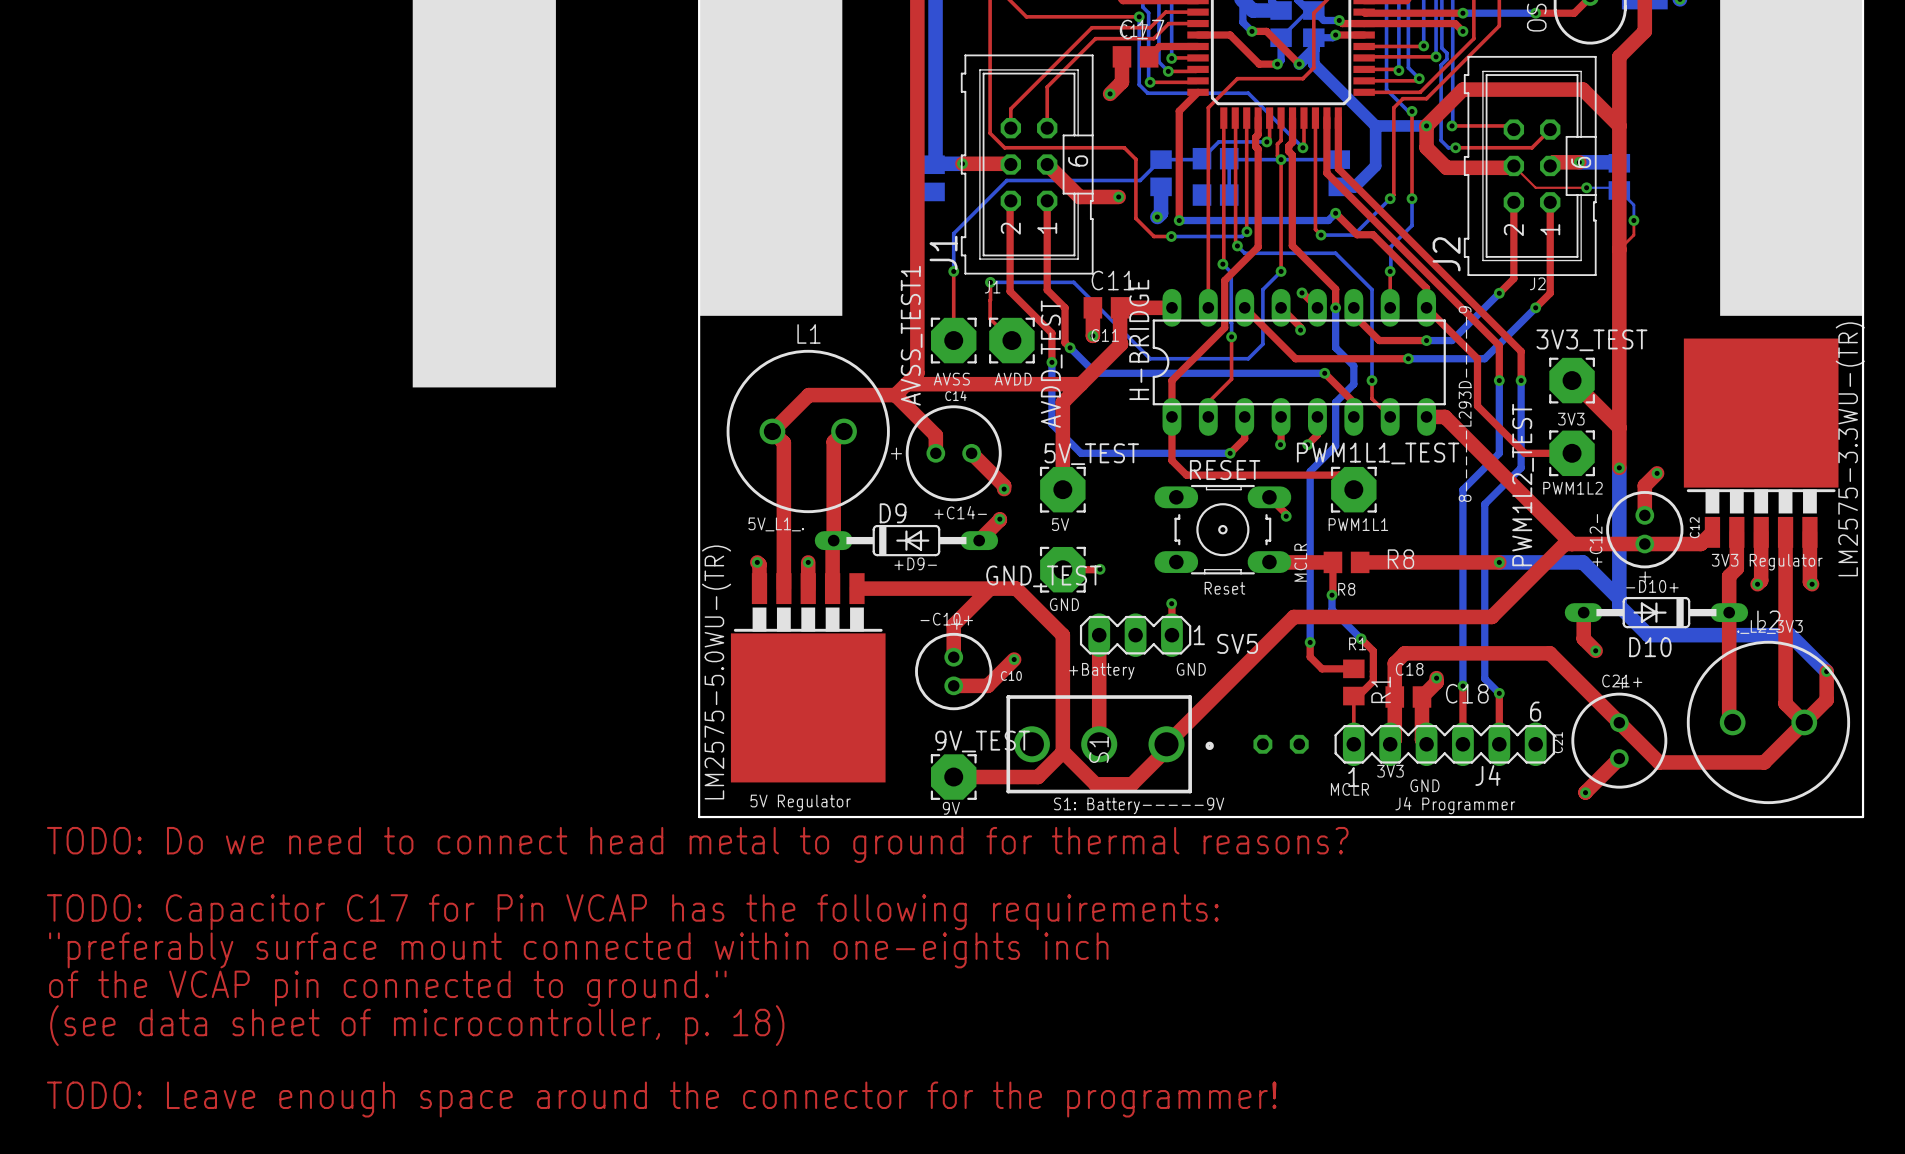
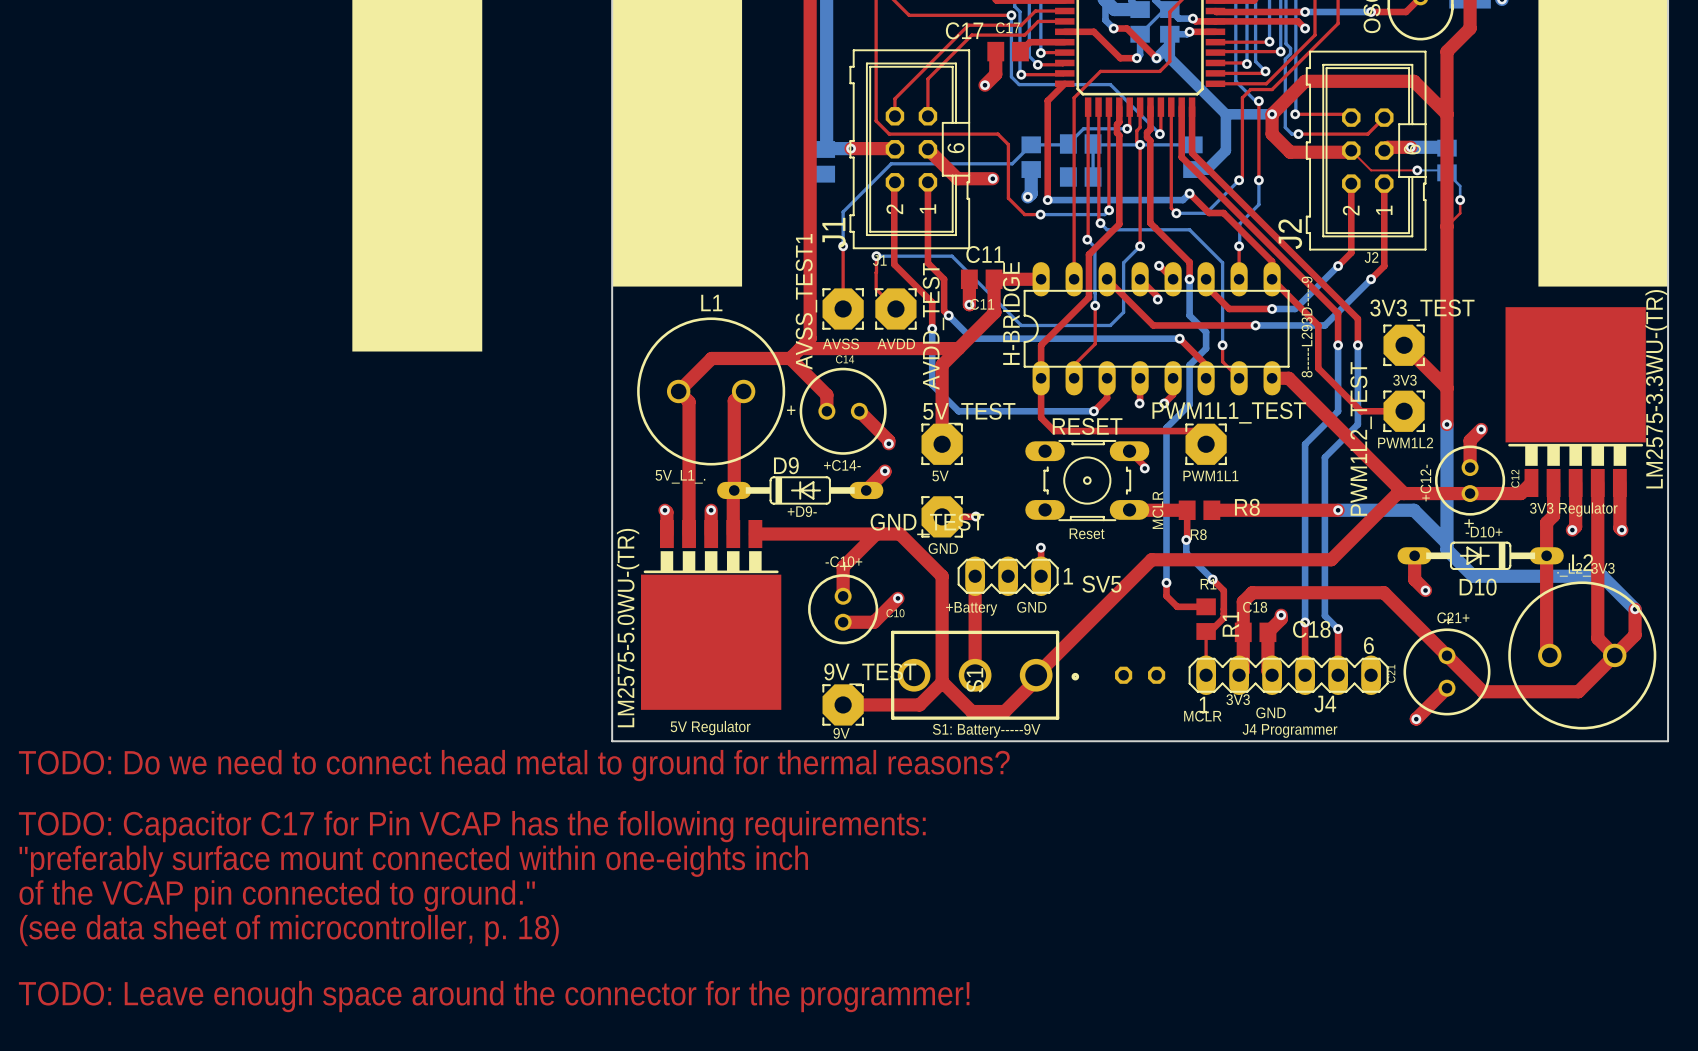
C17 name position: C17 (1142, 29) -> C17 (964, 30)

